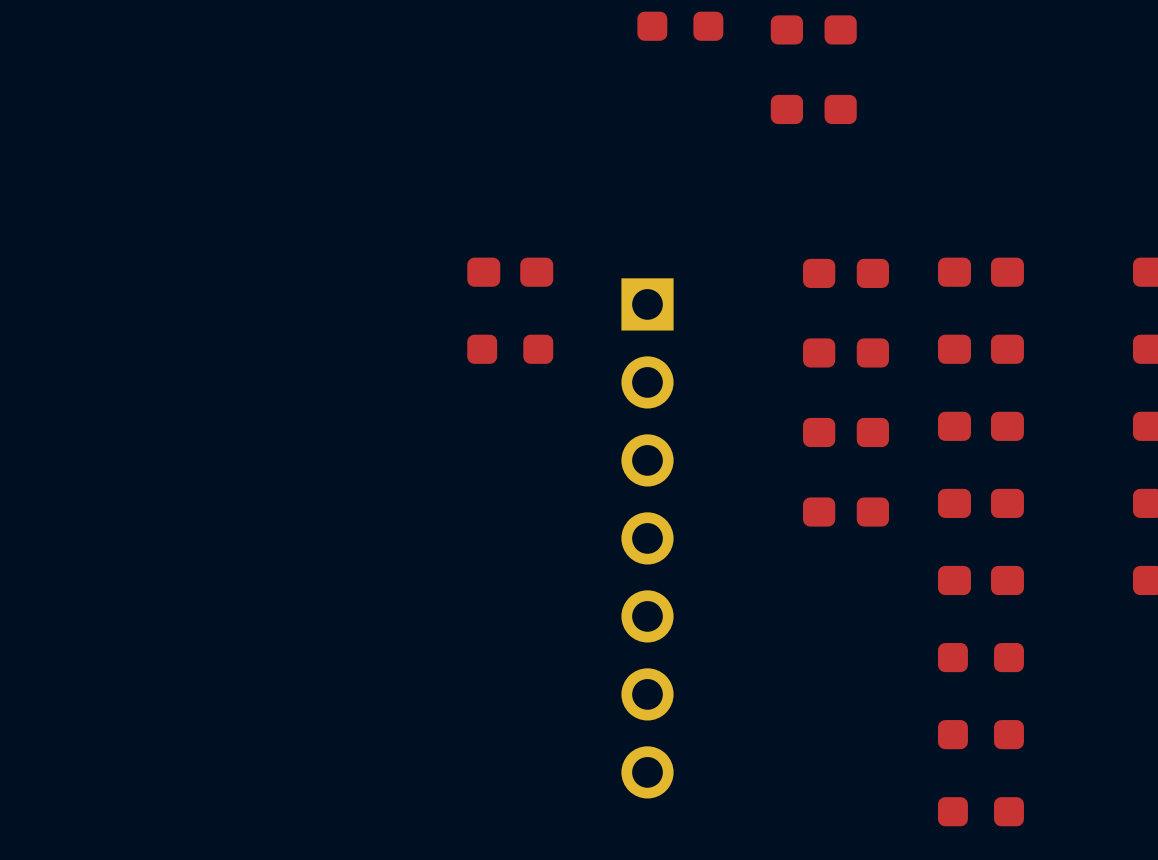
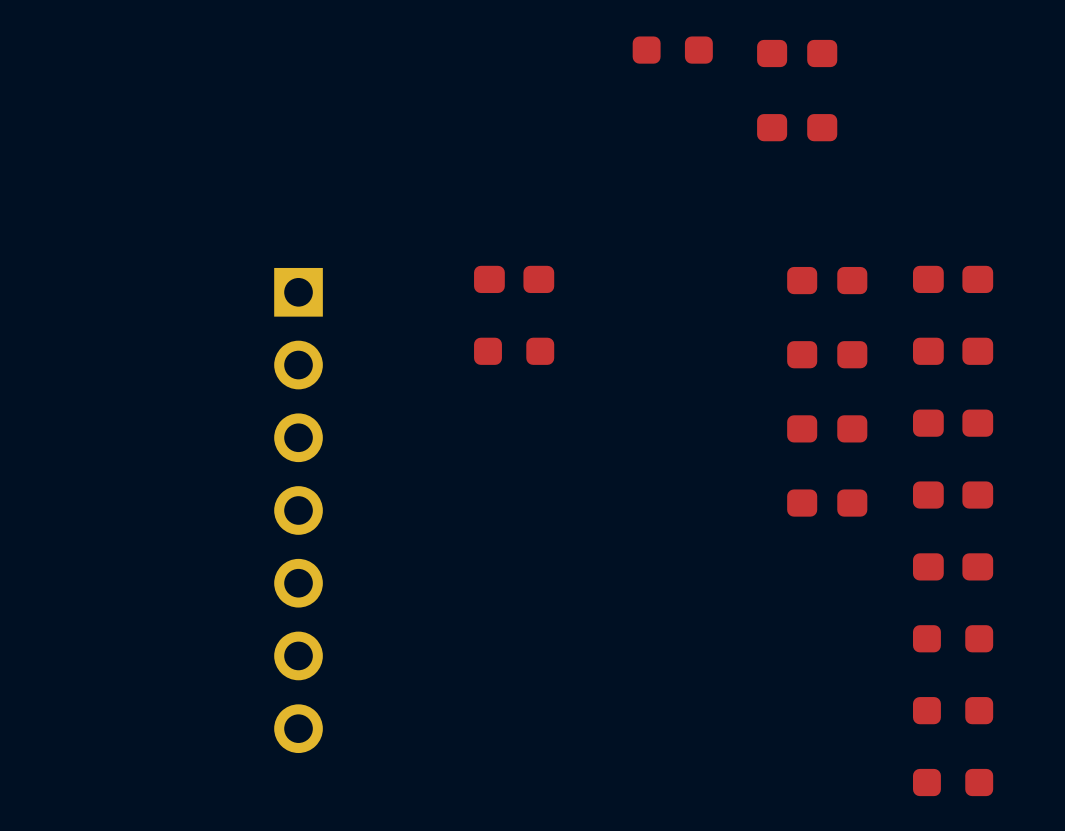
part position: (647, 538) -> (298, 510)

